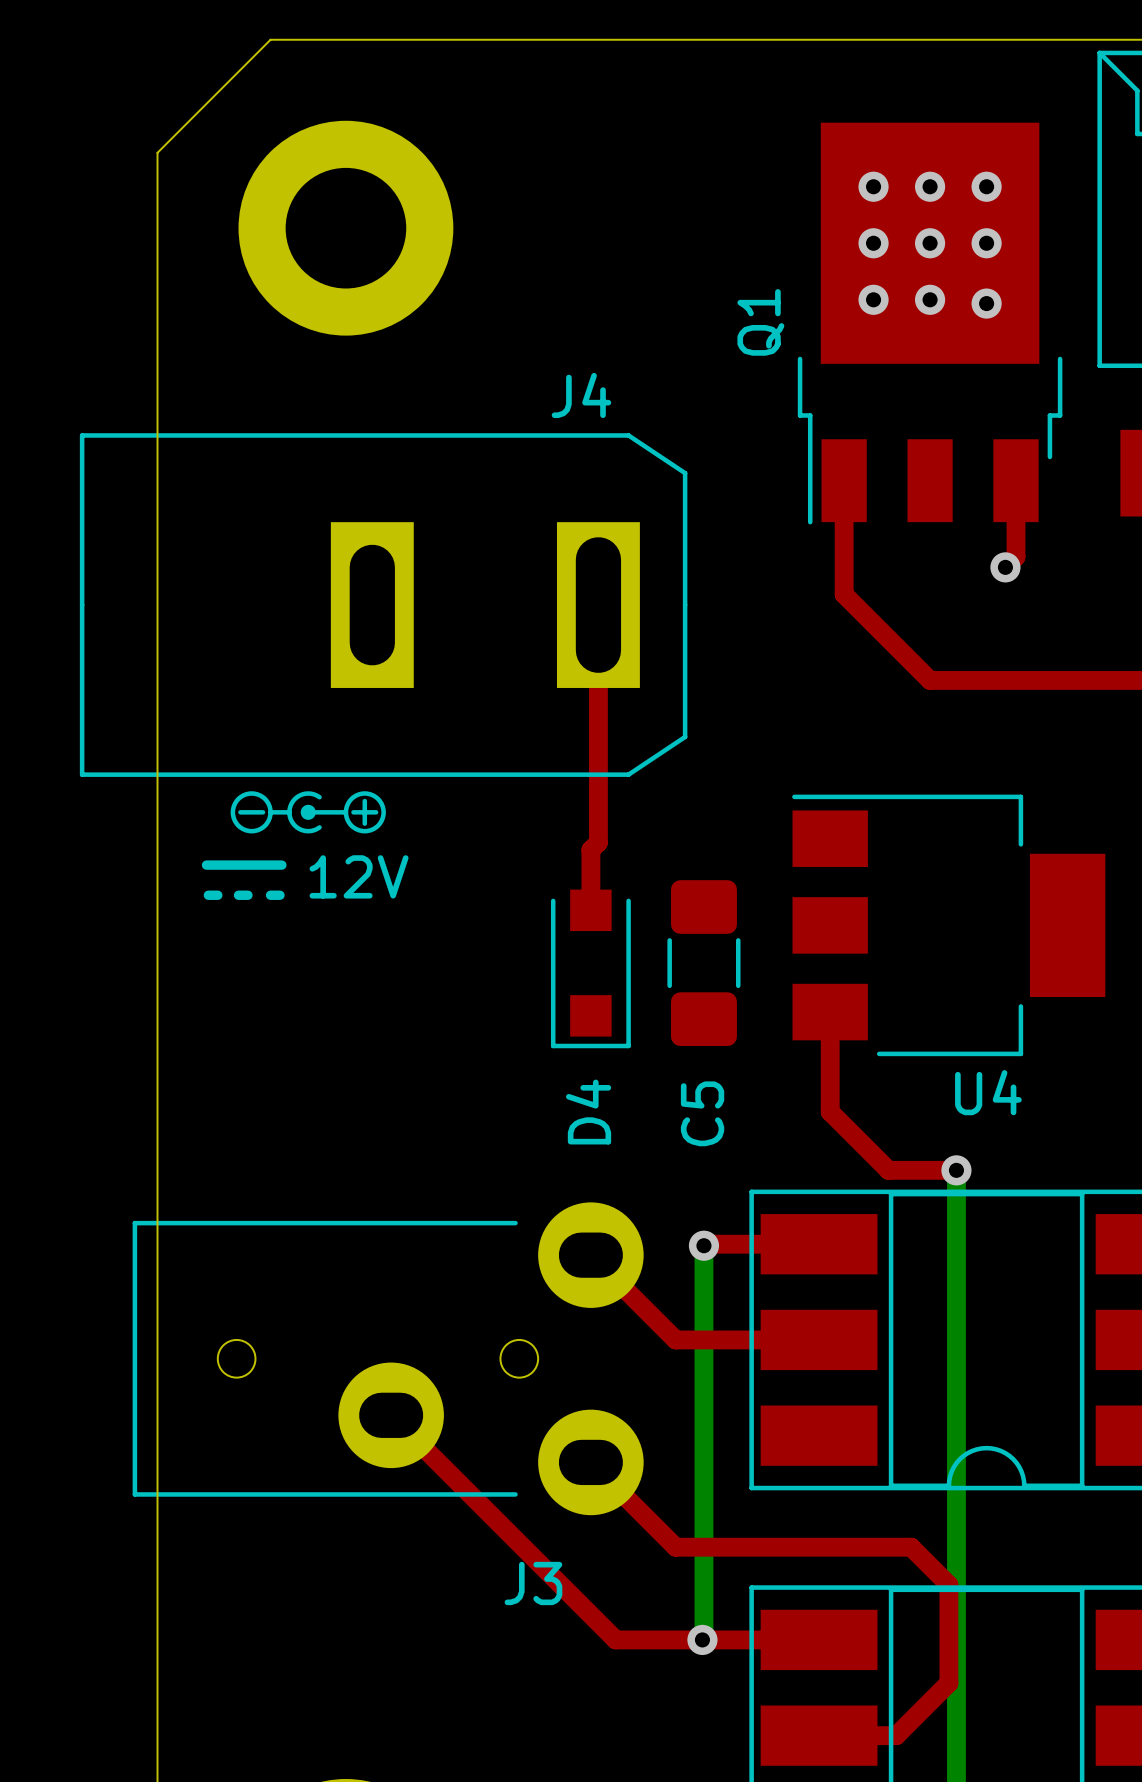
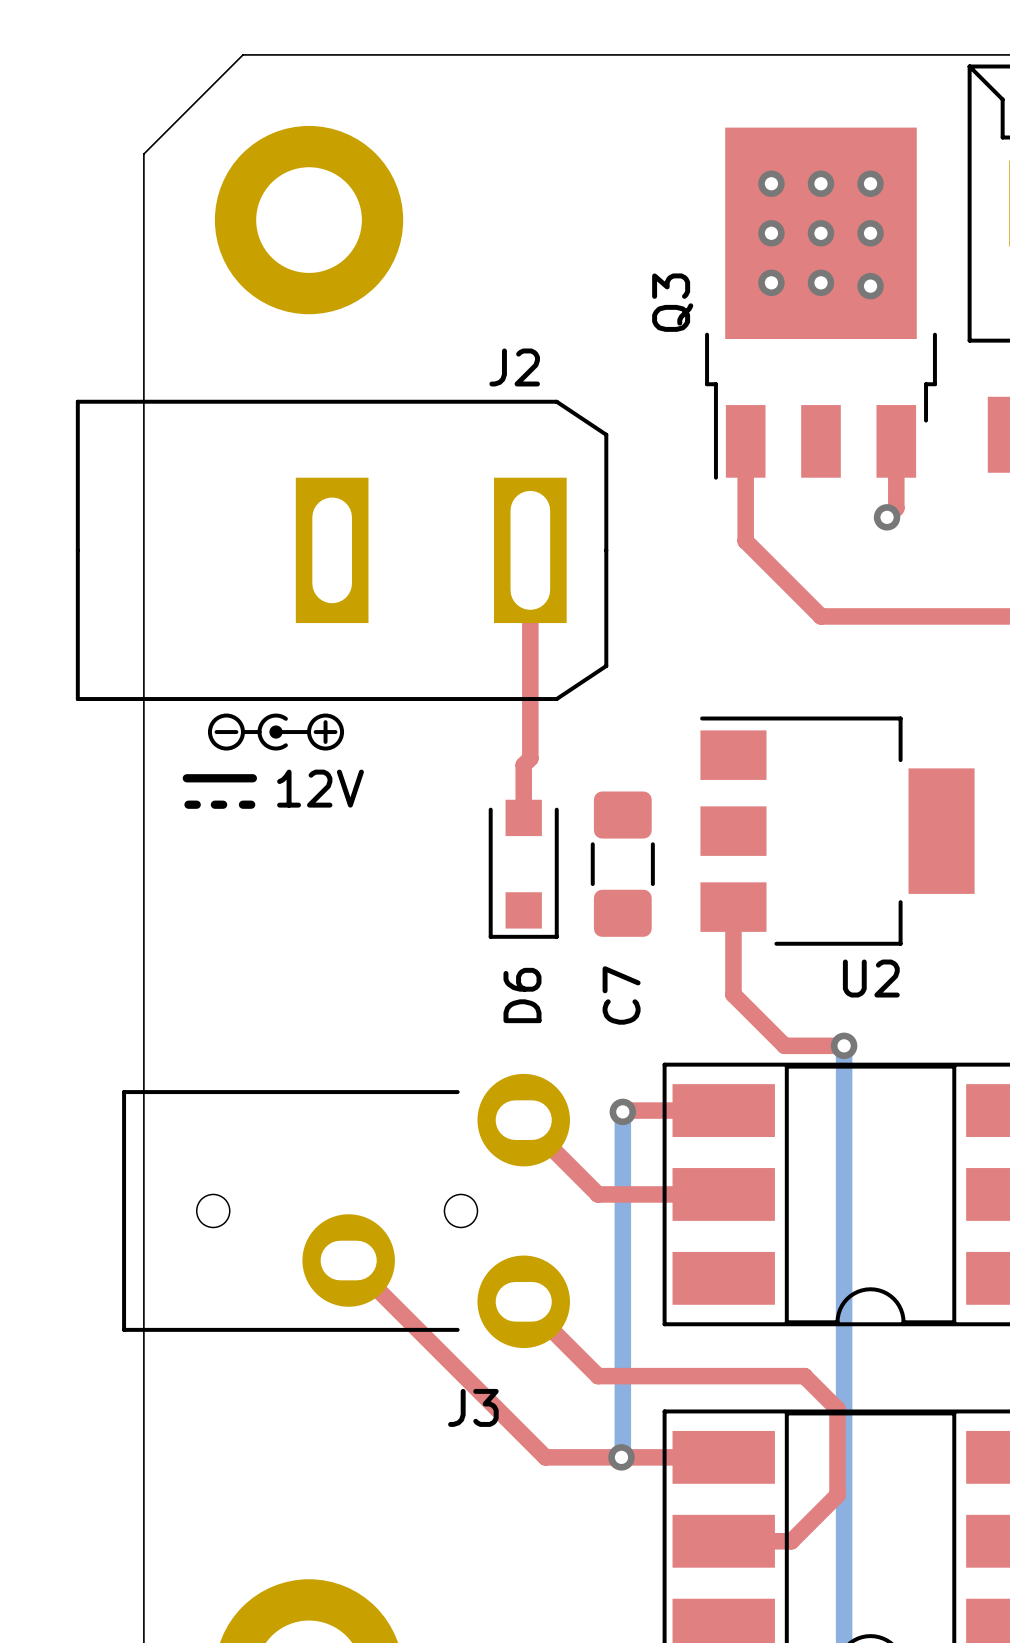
Q1 name: Q1 (760, 322) -> Q3 (672, 302)
J4 name: J4 (581, 395) -> J2 (514, 367)
U4 name: U4 (988, 1092) -> U2 (871, 978)
D4 name: D4 (588, 1112) -> D6 (522, 995)
C5 name: C5 (702, 1113) -> C7 (621, 995)

